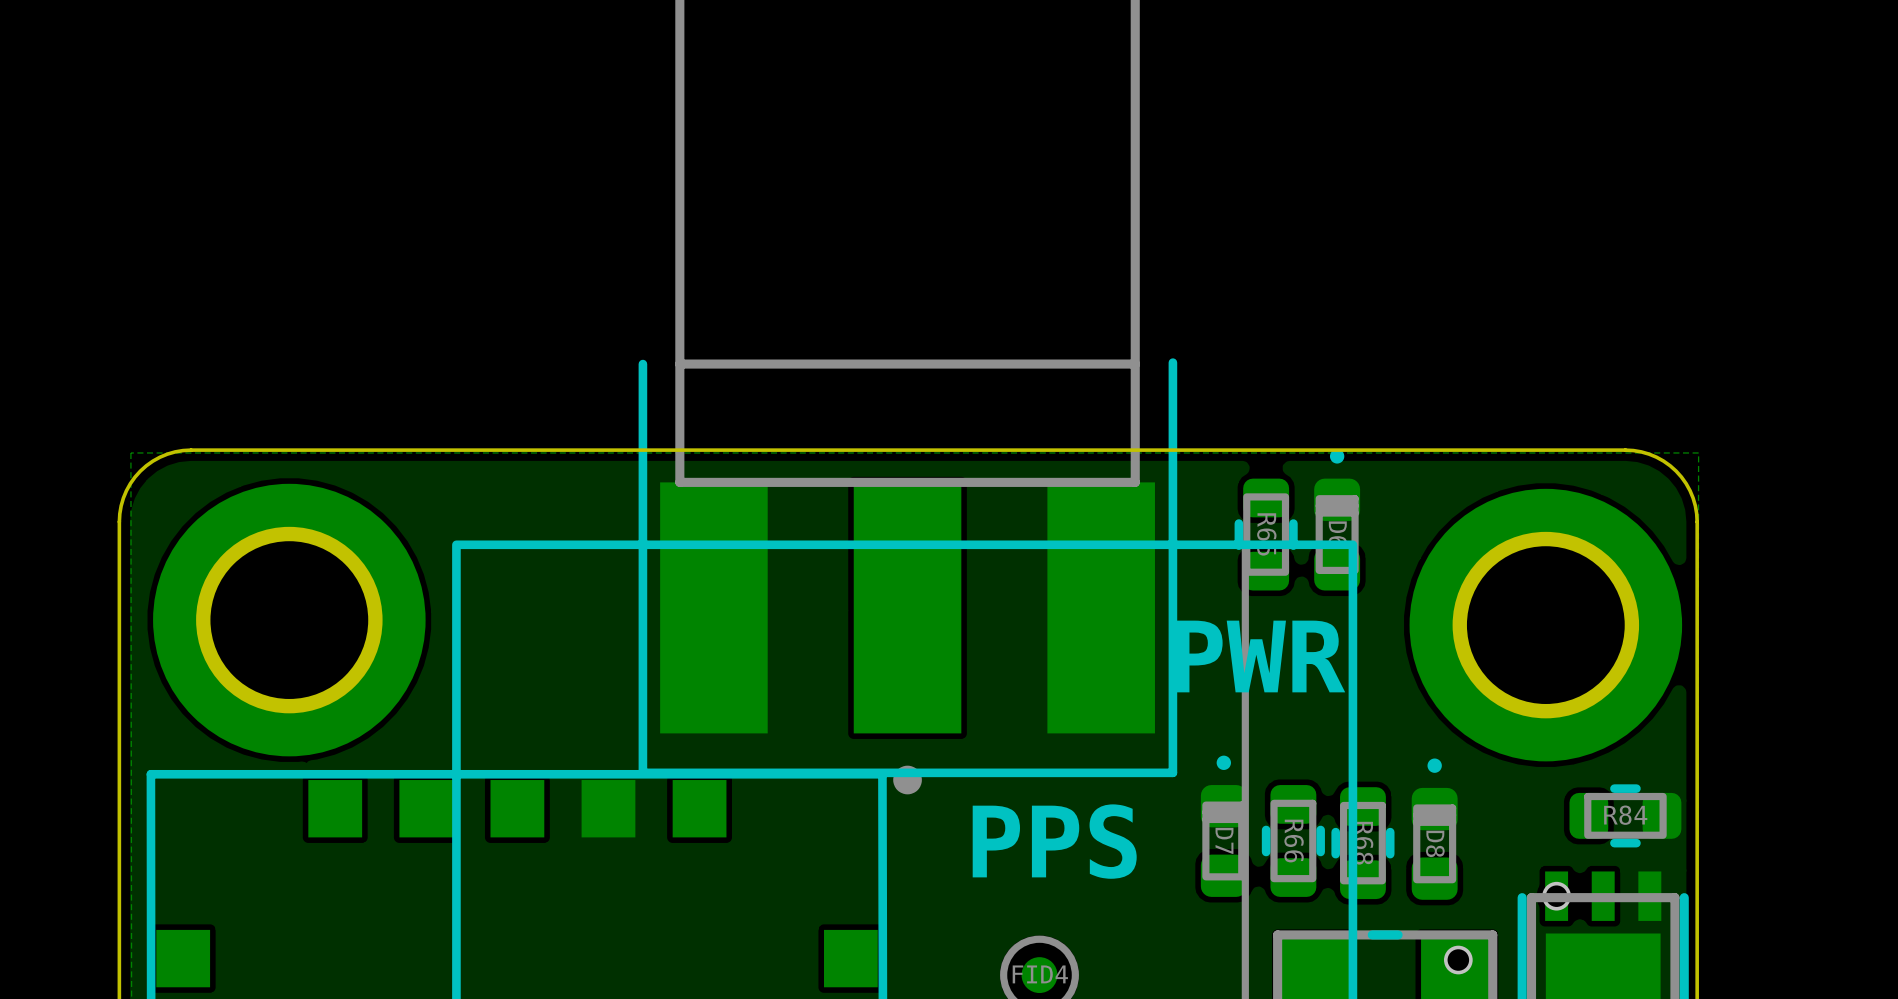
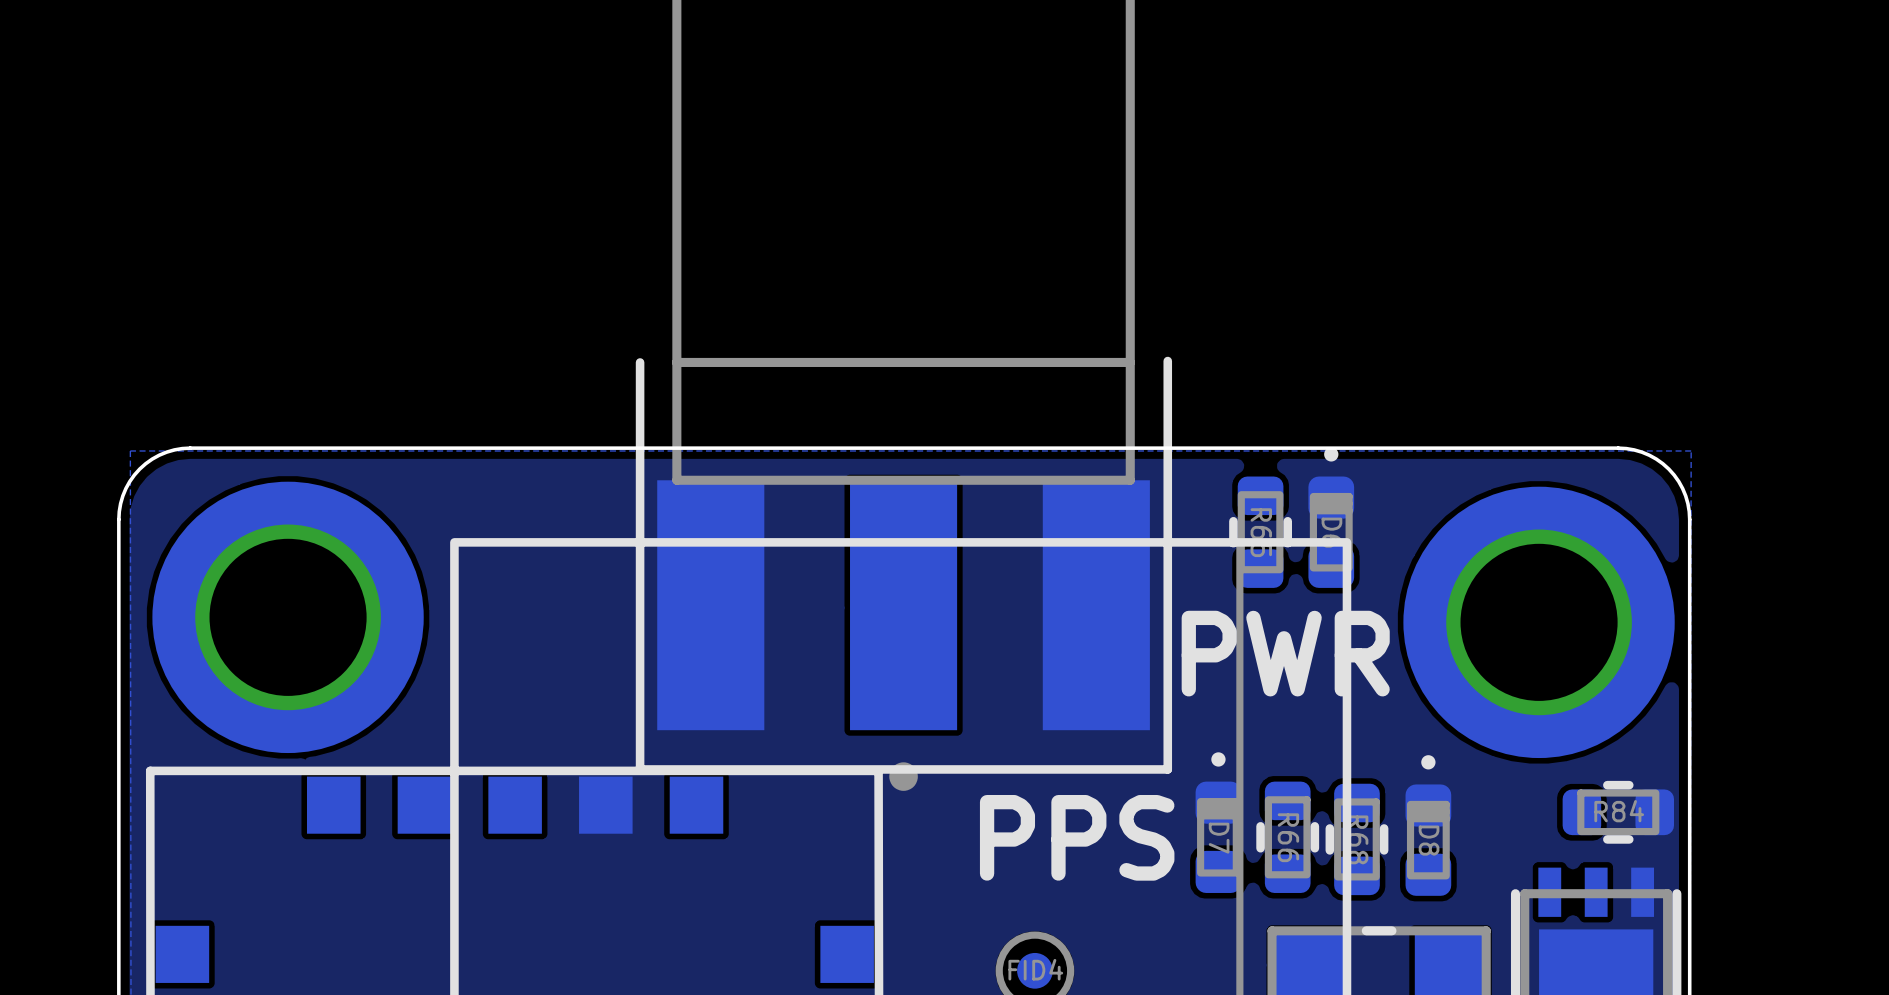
via: (1556, 896) -> none
via: (1458, 960) -> none

